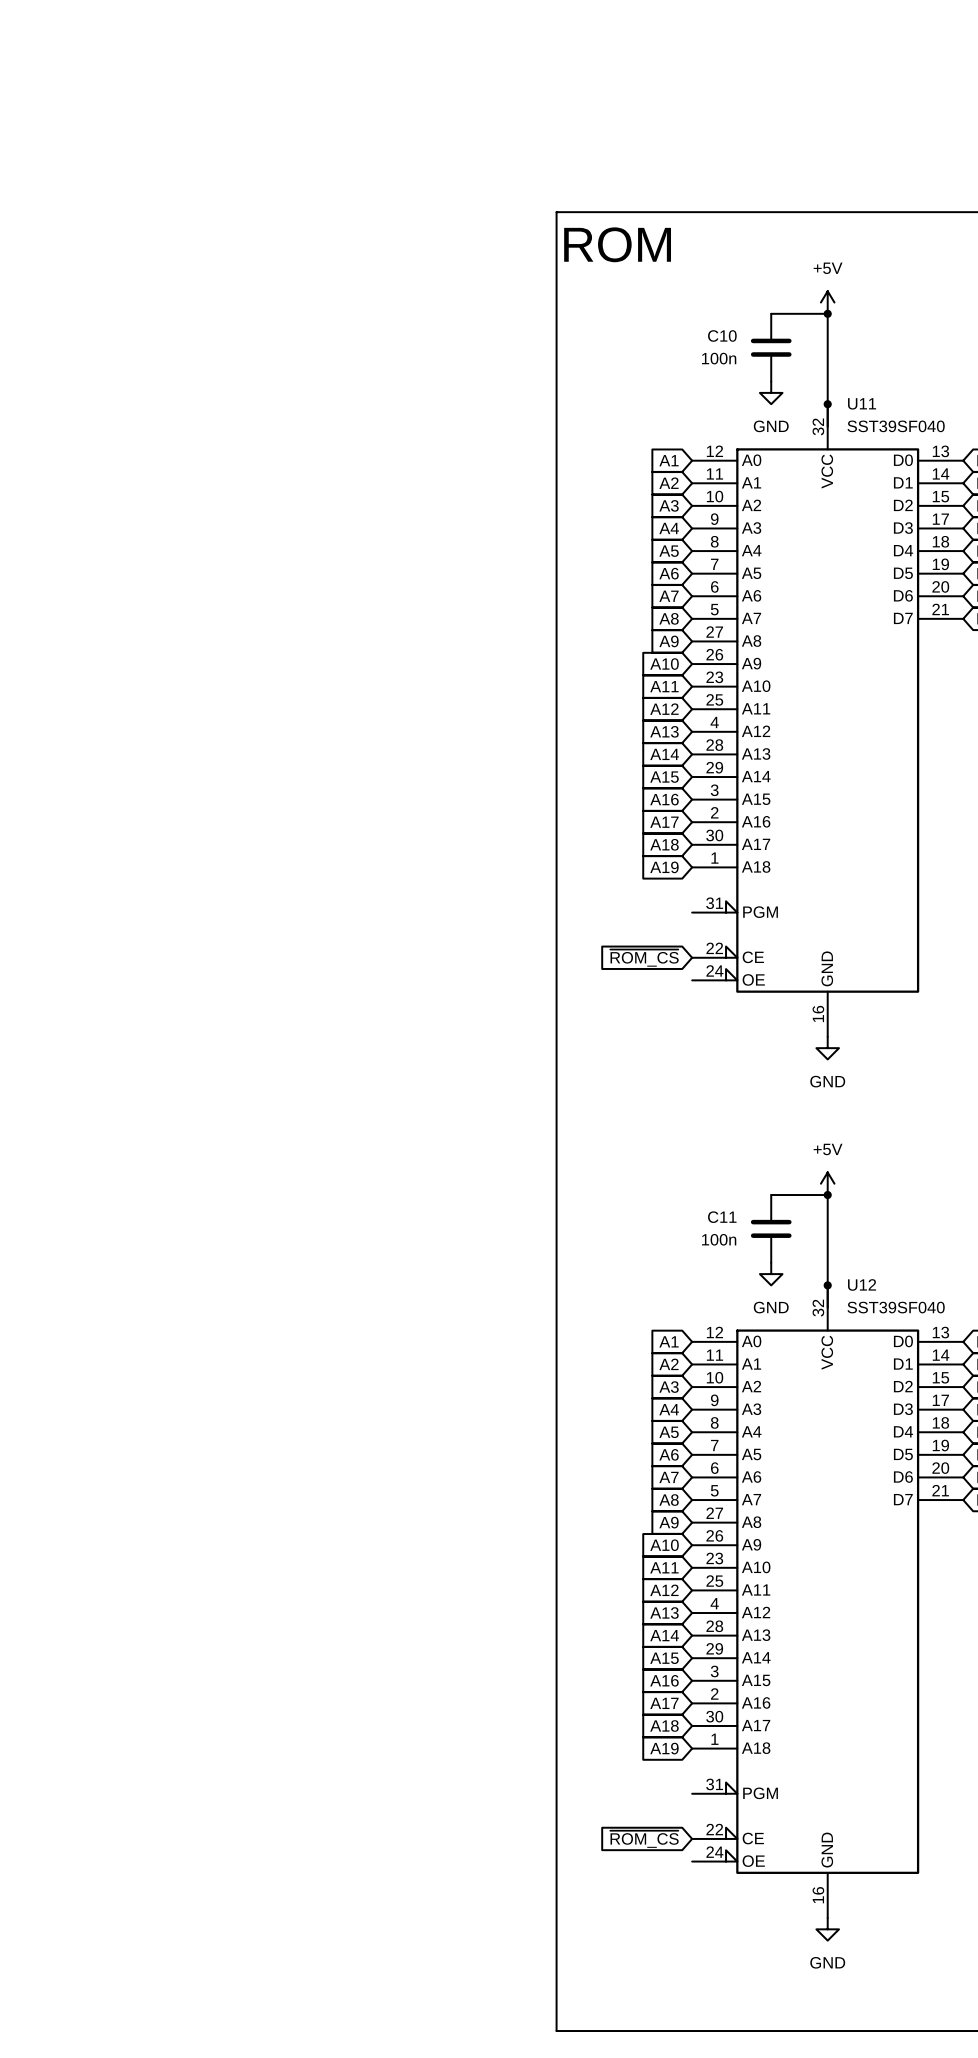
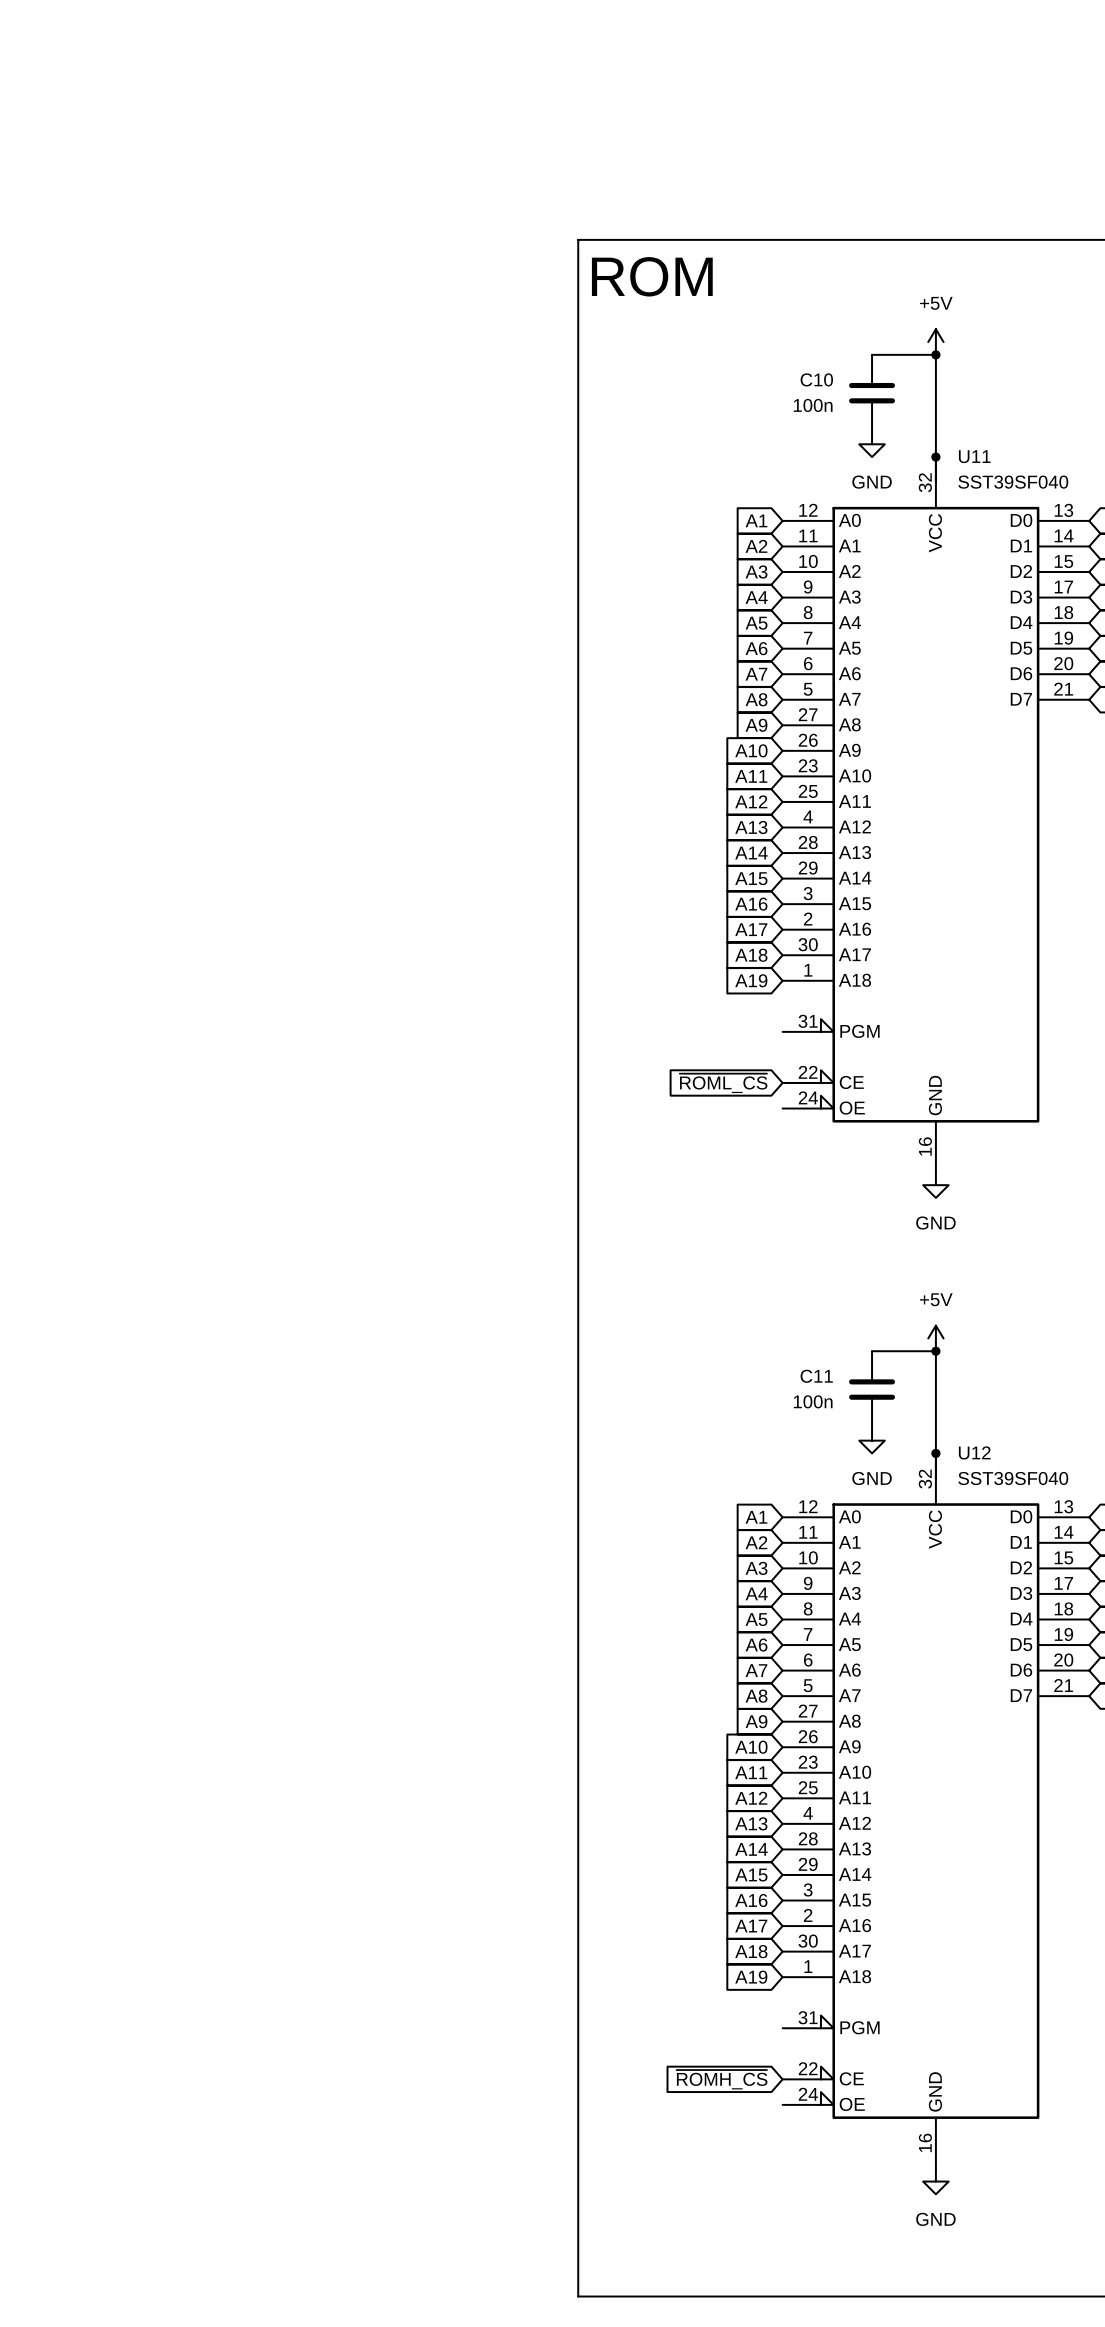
line: (556, 212) (556, 2031) -> (629, 239) (578, 239) (578, 2296) (629, 2296)
text position: ROM (617, 244) -> ROM (652, 276)
global label: ~{ROM_CS} (644, 958) -> ~{ROML_CS} (723, 1083)
global label: ~{ROM_CS} (644, 1839) -> ~{ROMH_CS} (722, 2079)

